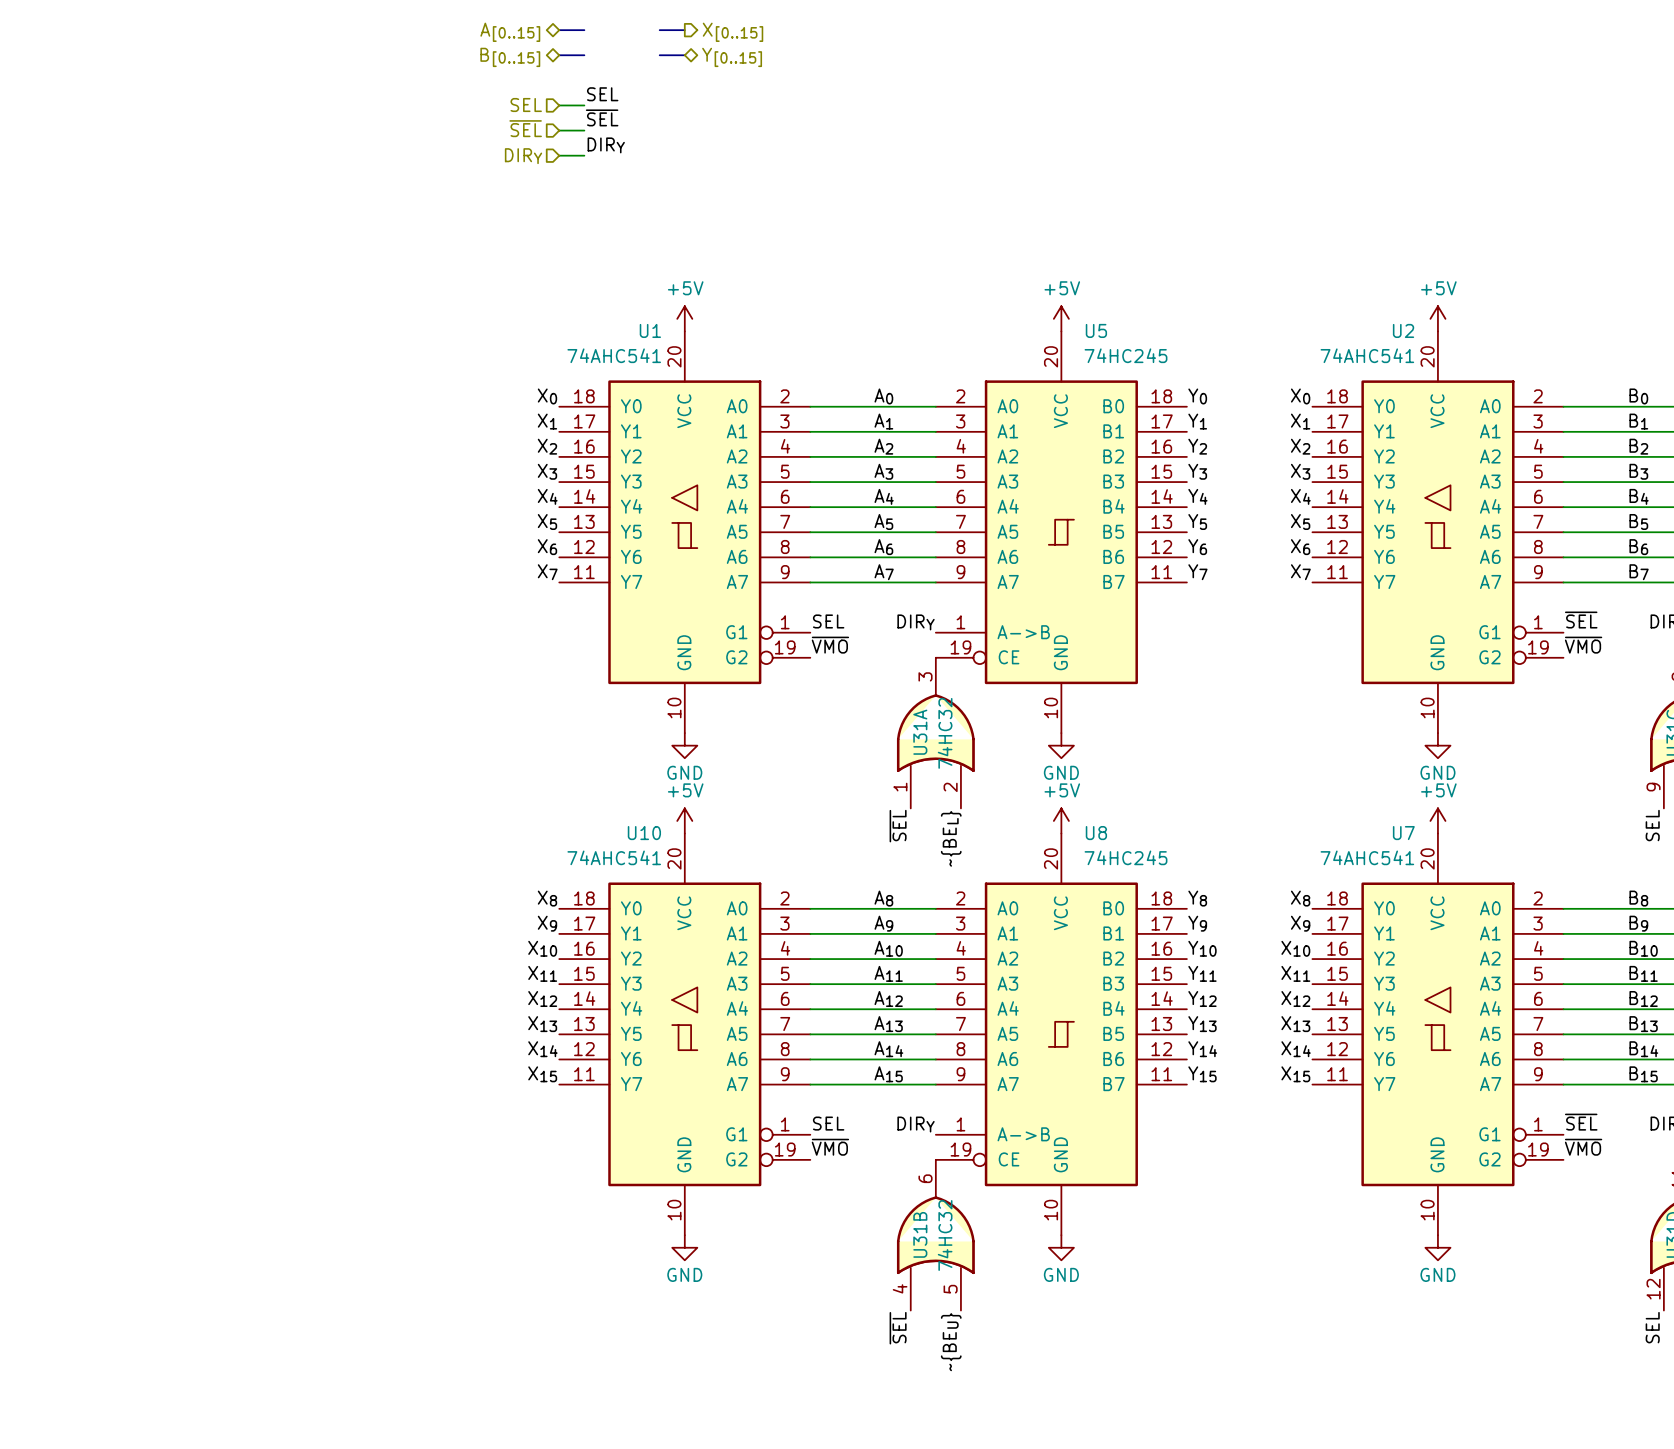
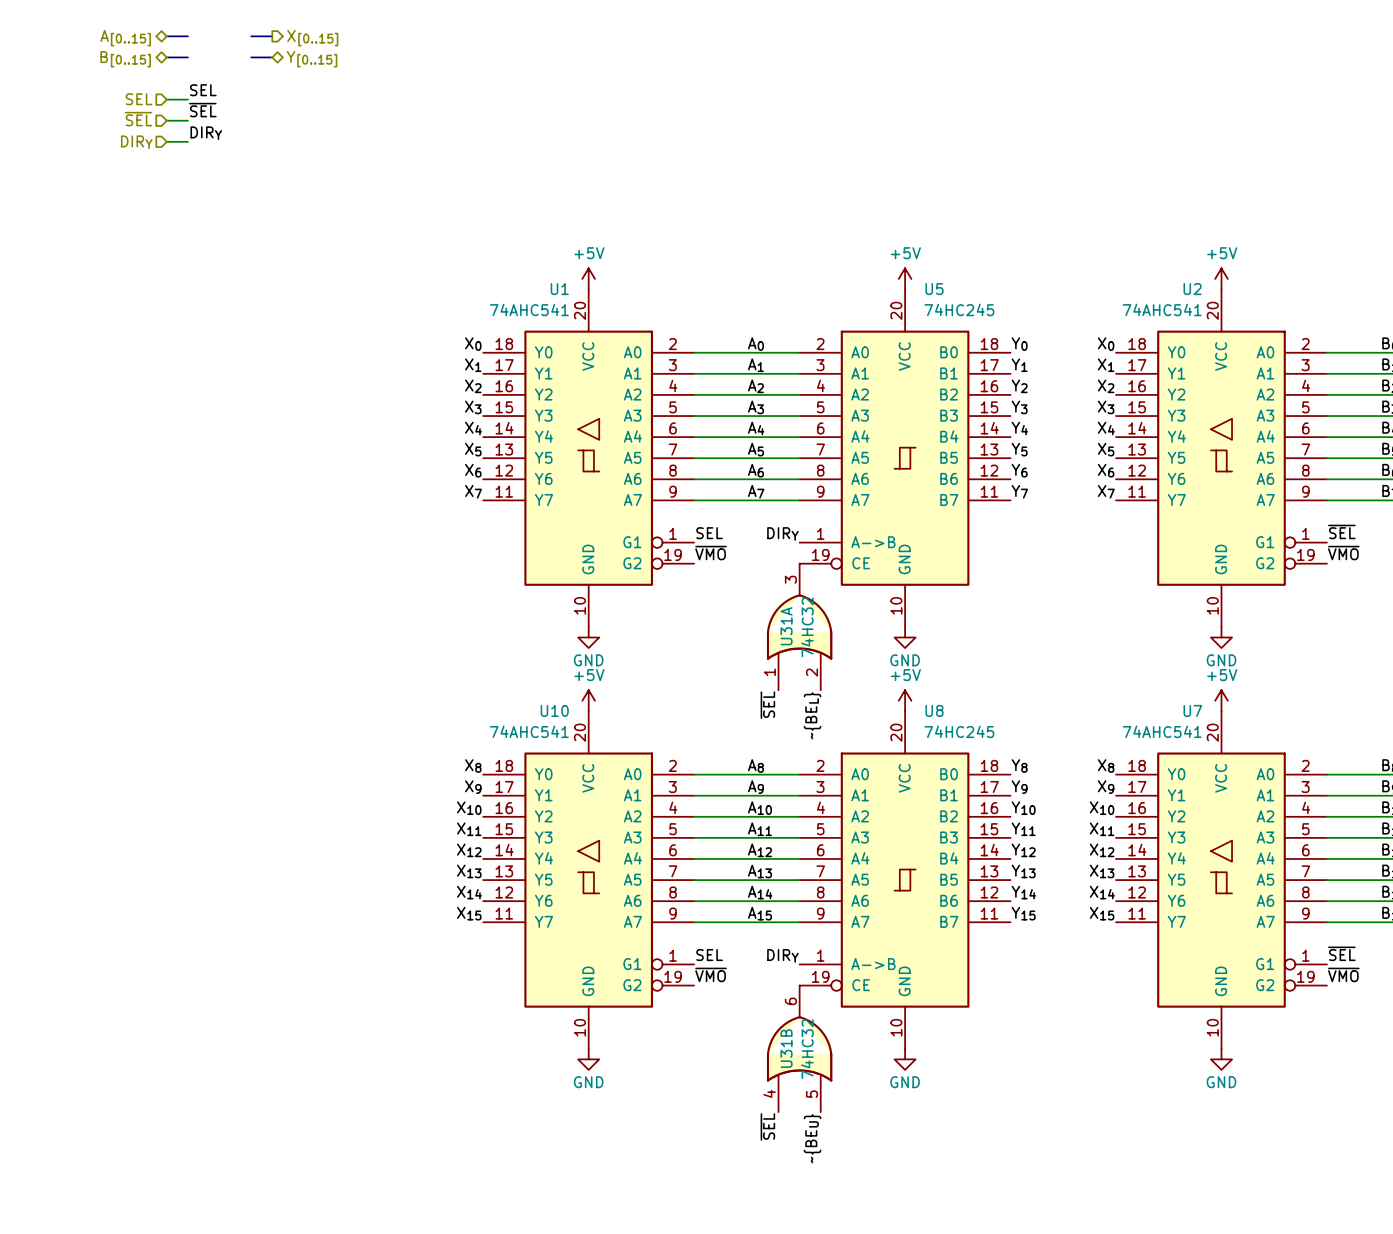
bus: none -> (166, 36) (187, 36)
bus: none -> (251, 36) (272, 36)
bus: (559, 30) (584, 30) -> none
bus: (659, 30) (684, 30) -> none
hierarchical label: none -> A[0..15] (125, 38)
hierarchical label: none -> X[0..15] (312, 38)
hierarchical label: A[0..15] (510, 32) -> none
hierarchical label: X[0..15] (732, 32) -> none
bus: none -> (166, 57) (187, 57)
bus: none -> (251, 57) (272, 57)
bus: (559, 55) (584, 55) -> none
bus: (659, 55) (684, 55) -> none
hierarchical label: none -> B[0..15] (125, 59)
hierarchical label: none -> Y[0..15] (312, 59)
hierarchical label: B[0..15] (510, 57) -> none
hierarchical label: Y[0..15] (732, 57) -> none
label: none -> SEL (203, 90)
label: SEL (602, 94) -> none
hierarchical label: none -> SEL (139, 99)
wire: none -> (166, 99) (187, 99)
hierarchical label: SEL (526, 105) -> none
wire: (559, 105) (584, 105) -> none
label: none -> ~{SEL} (202, 110)
label: ~{SEL} (602, 117) -> none
hierarchical label: none -> ~{SEL} (138, 119)
hierarchical label: ~{SEL} (525, 128) -> none
wire: none -> (166, 120) (187, 120)
wire: (559, 130) (584, 130) -> none
label: none -> DIRY (206, 133)
label: DIRY (606, 145) -> none
wire: none -> (166, 141) (187, 141)
wire: (559, 155) (584, 155) -> none
hierarchical label: none -> DIRY (136, 142)
hierarchical label: DIRY (523, 156) -> none

